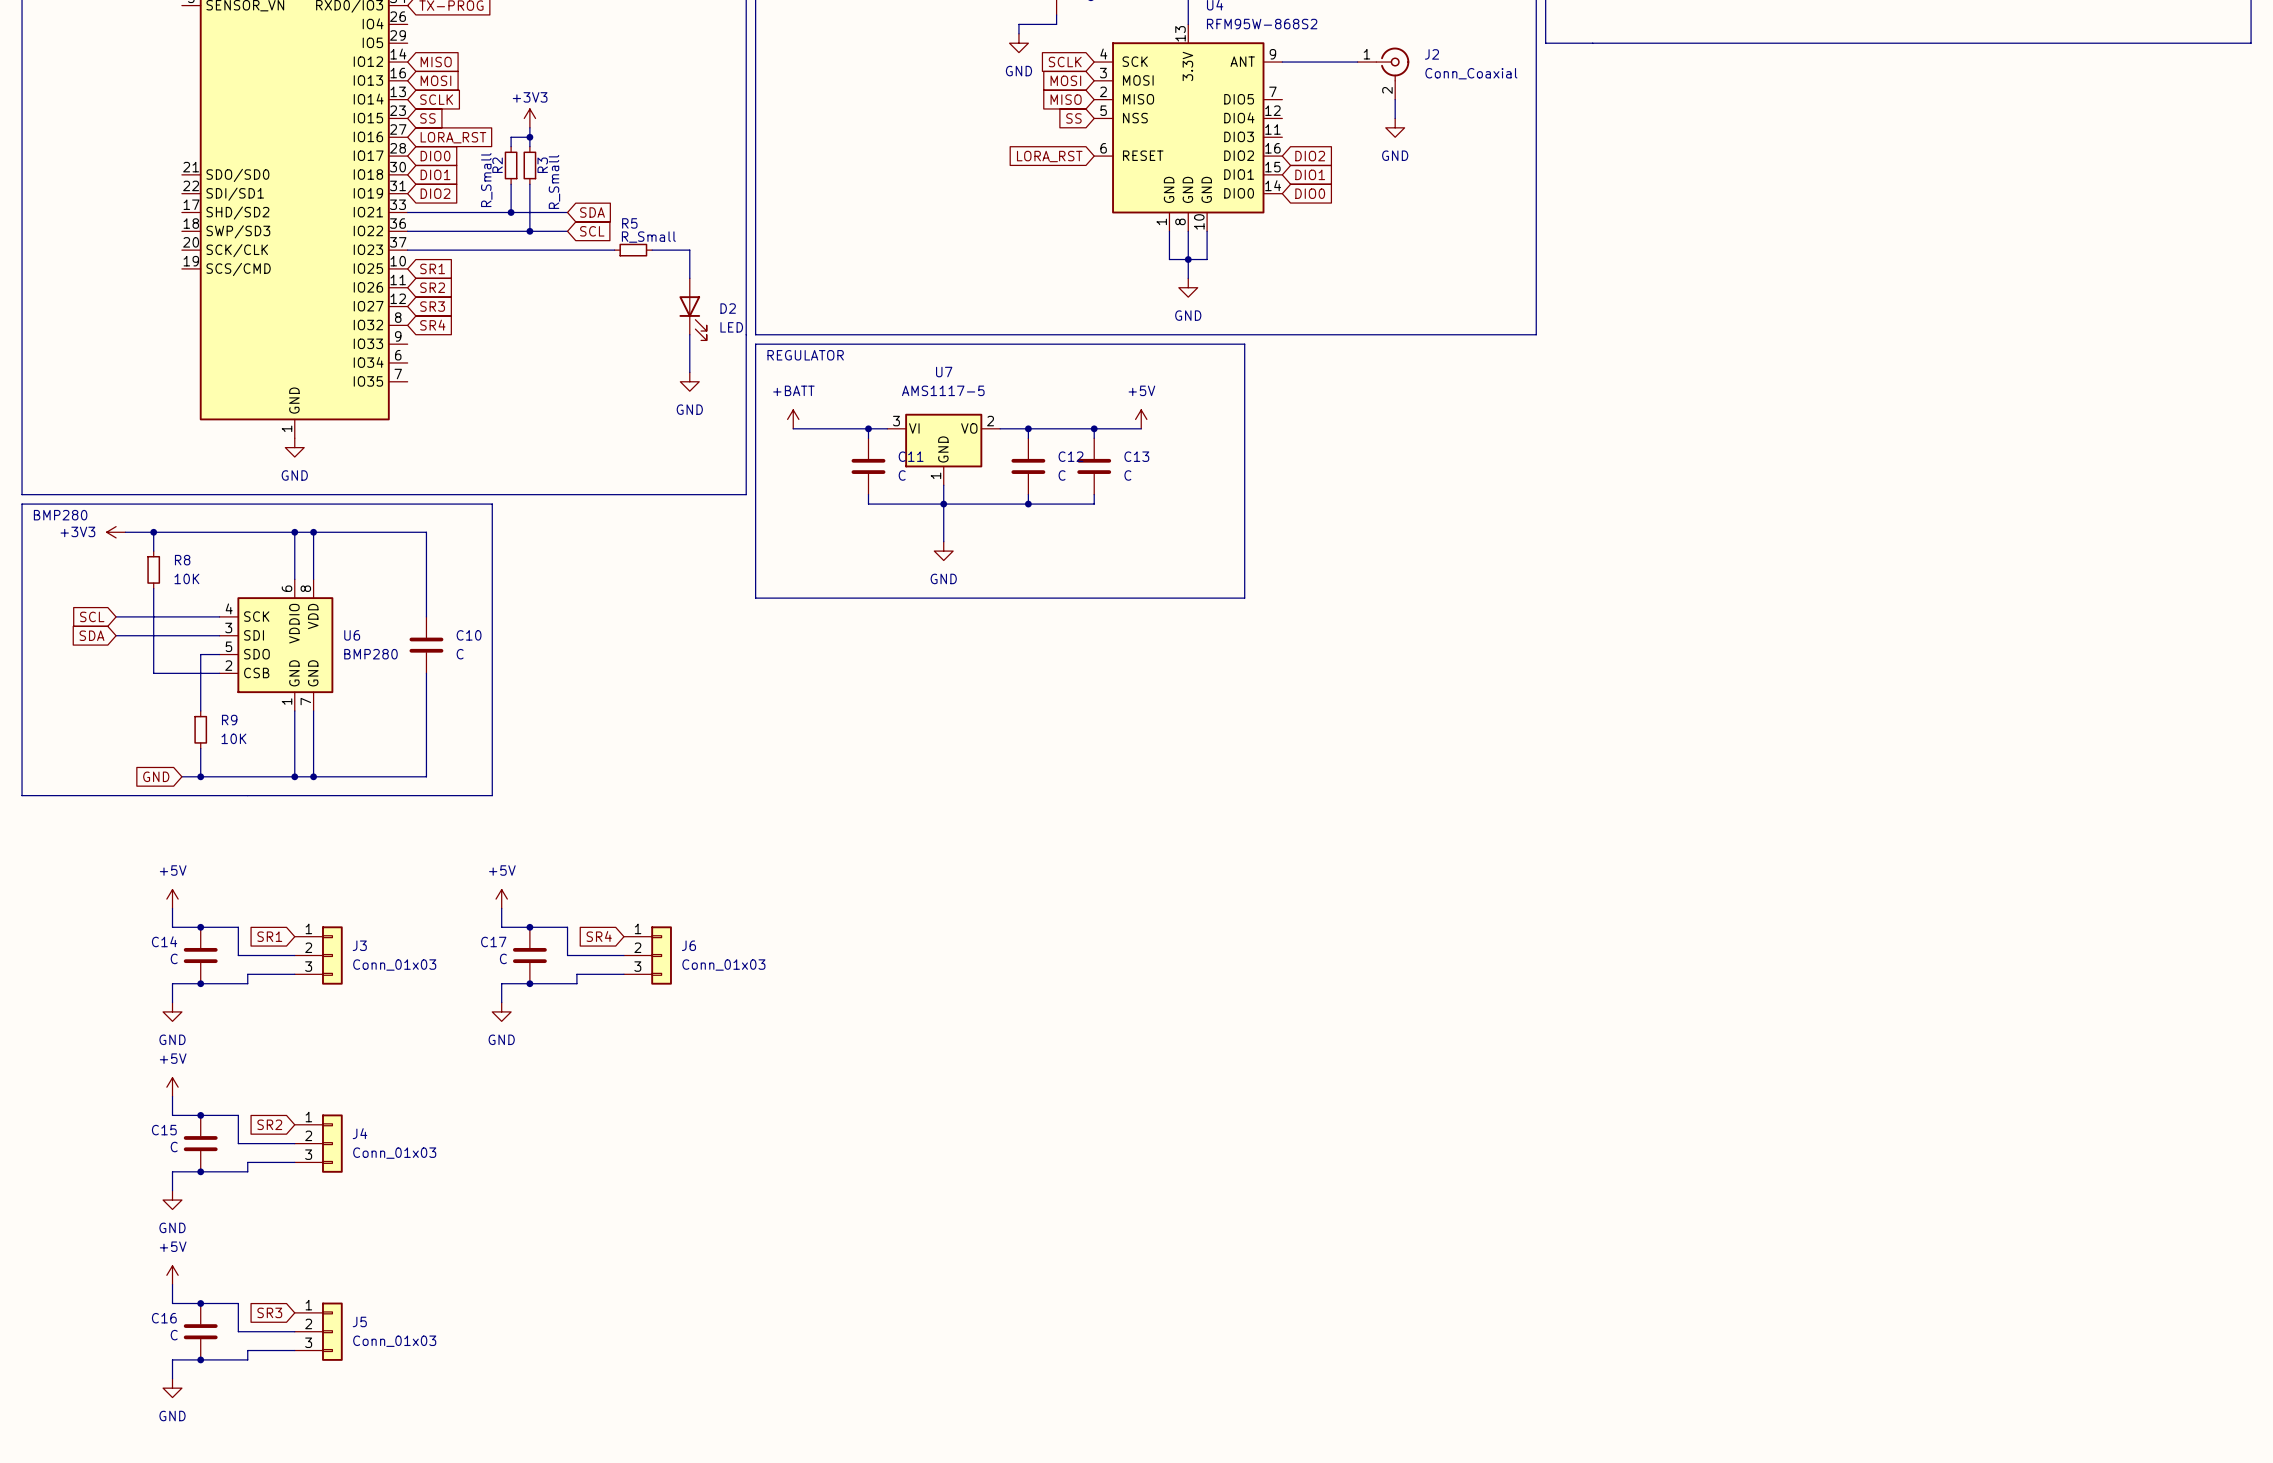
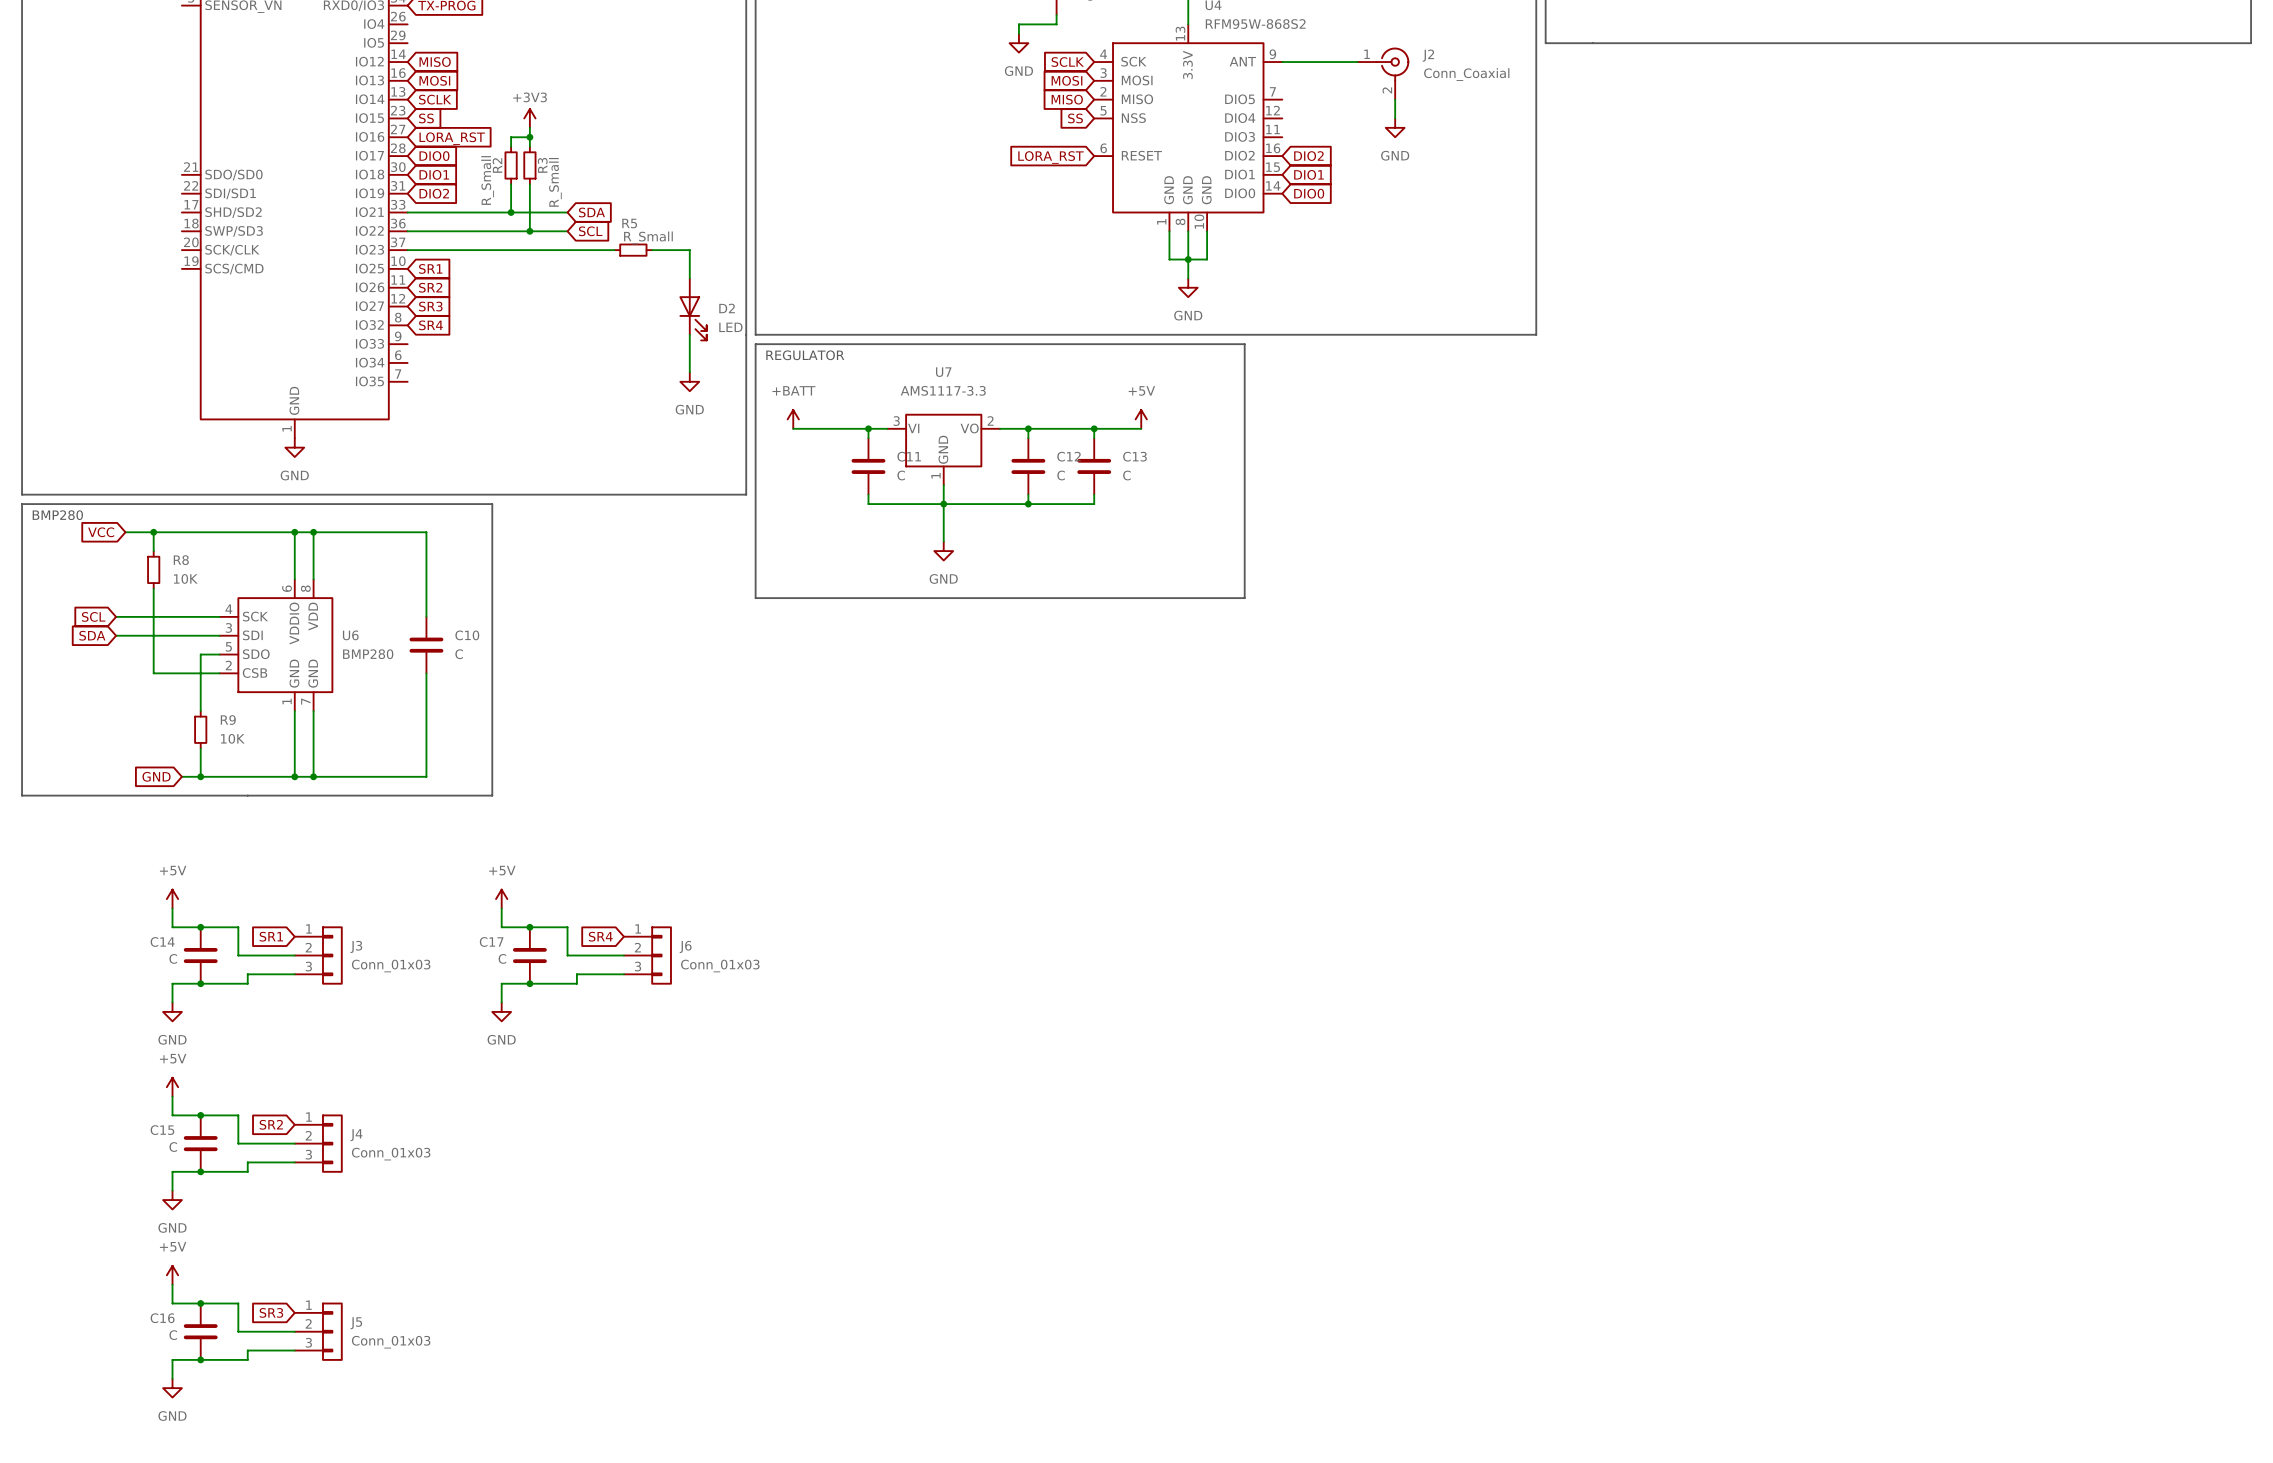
U7 value: AMS1117-5 (943, 390) -> AMS1117-3.3 (943, 390)
global label: none -> VCC (101, 532)
power symbol: +3V3 (116, 532) -> none

